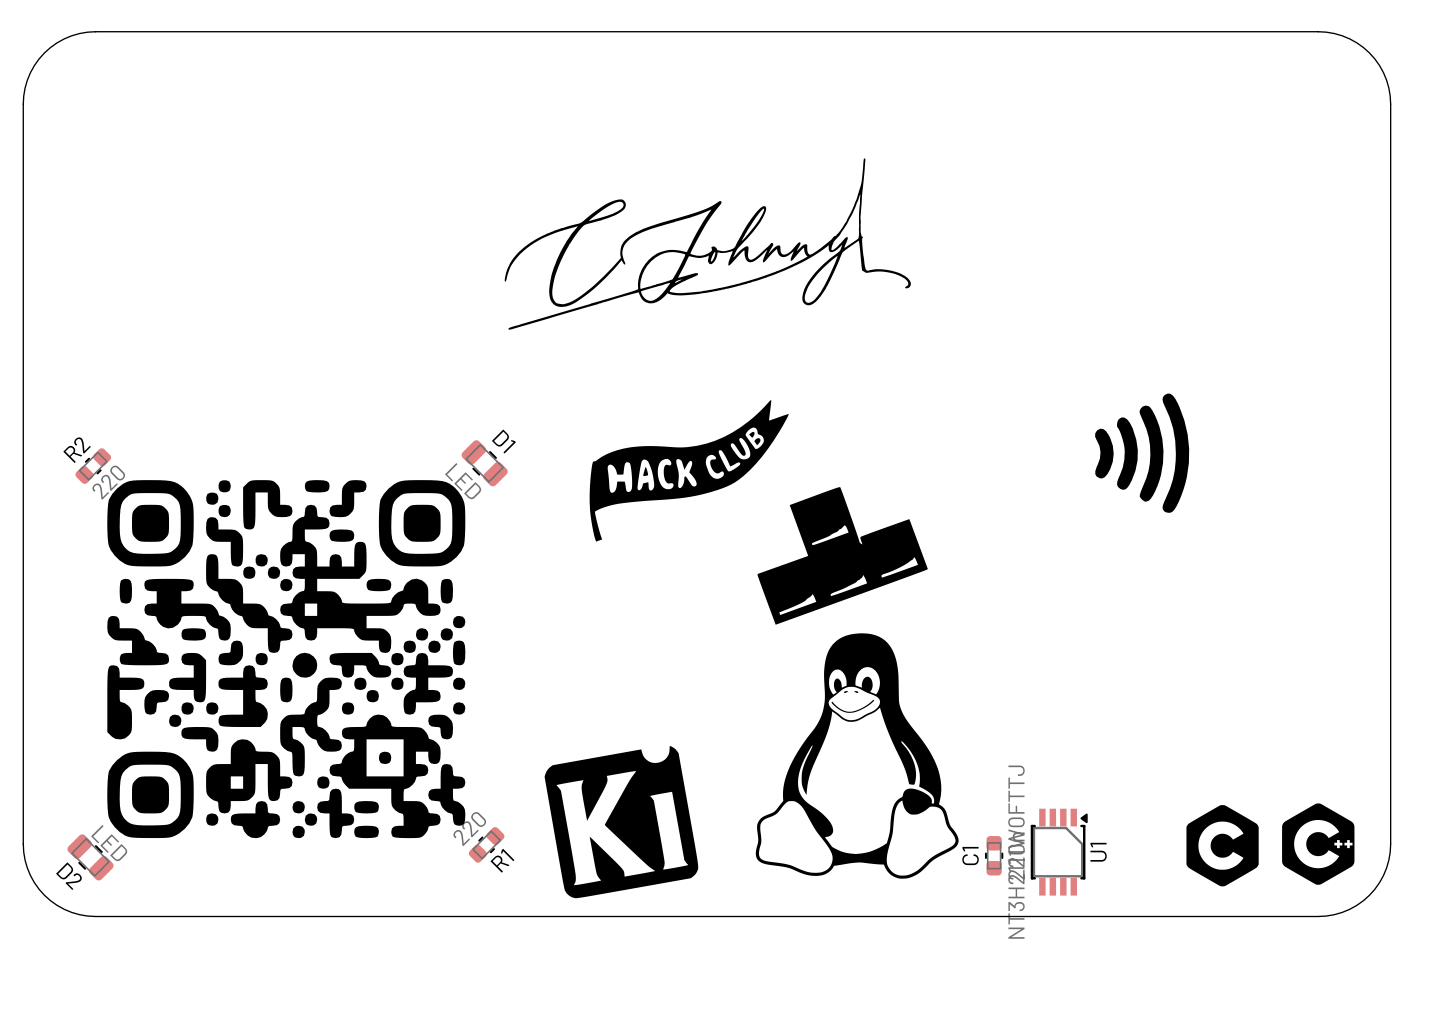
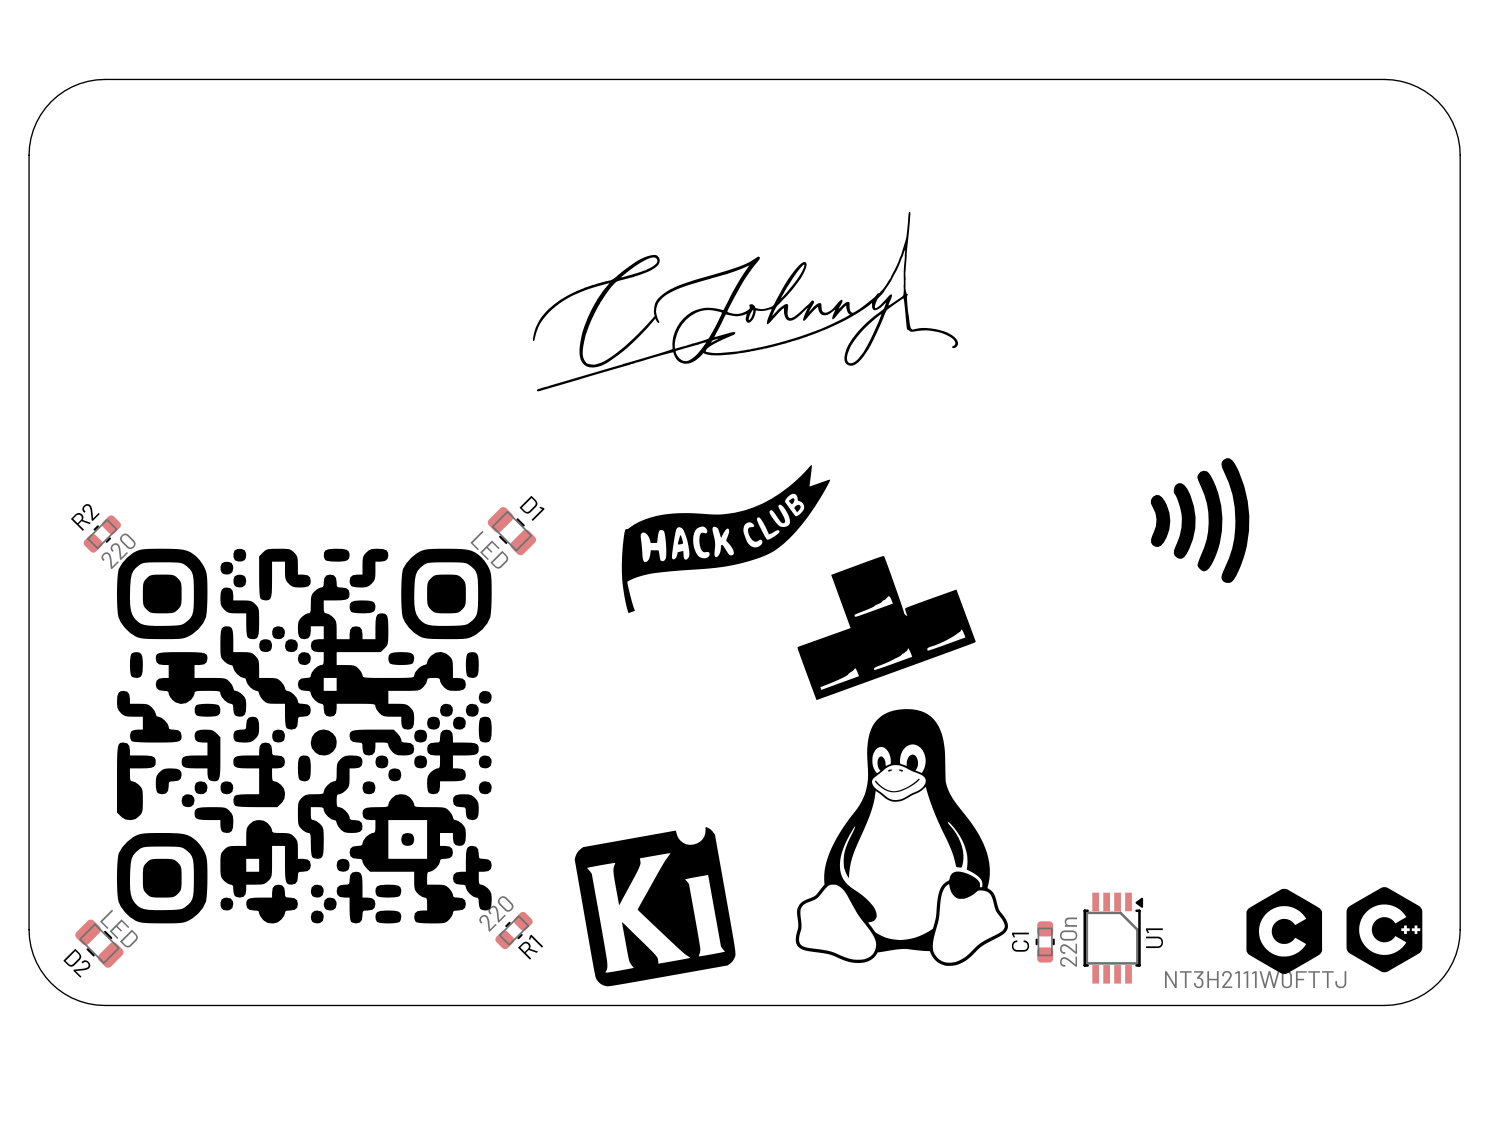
U1 value rotation: 0° (1016, 852) -> 90° clockwise (1255, 979)

